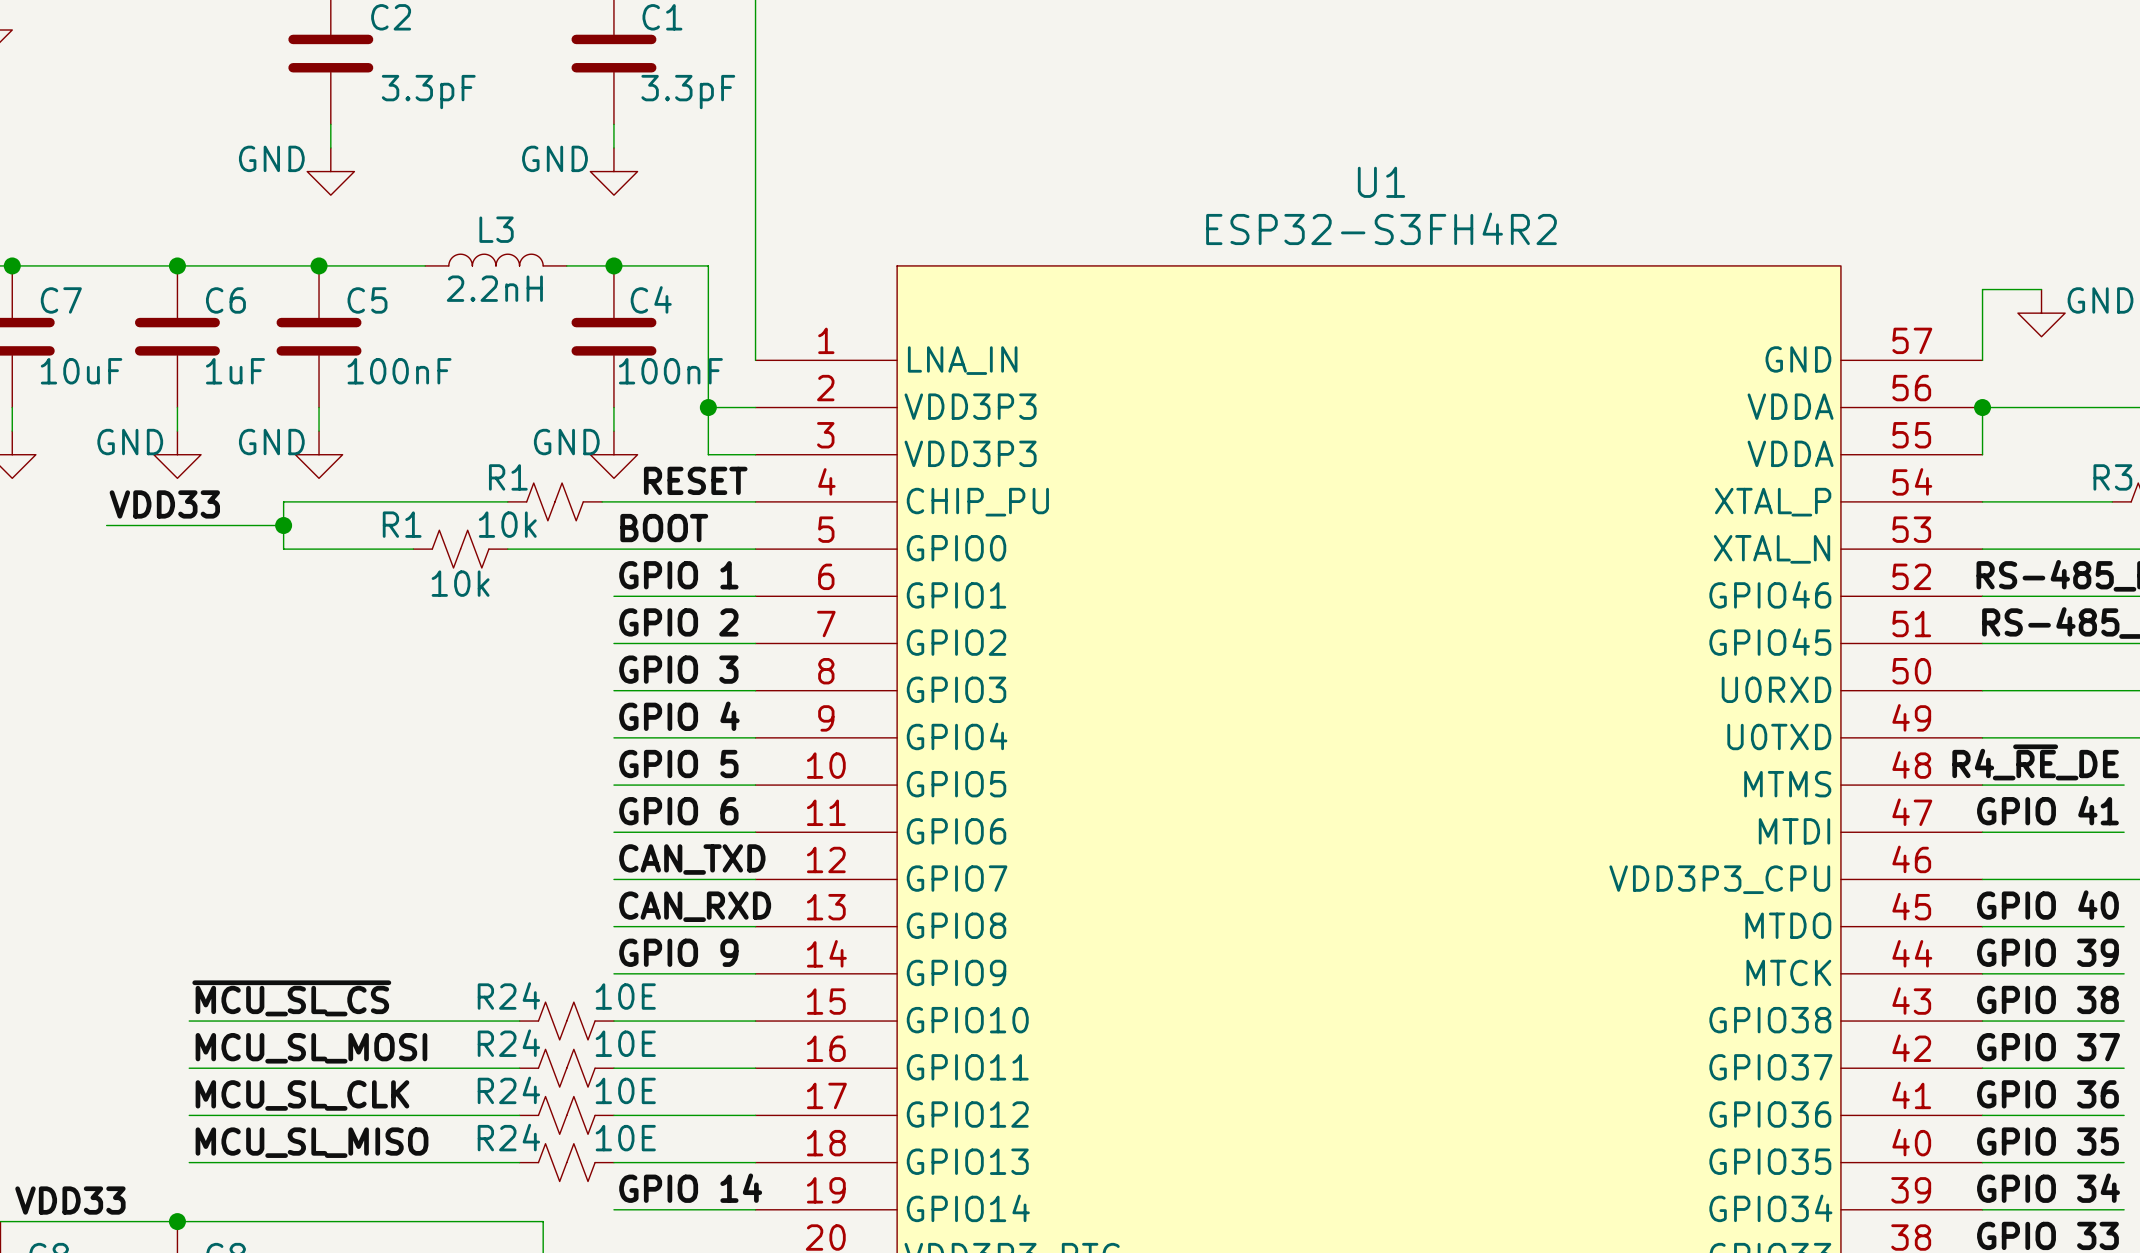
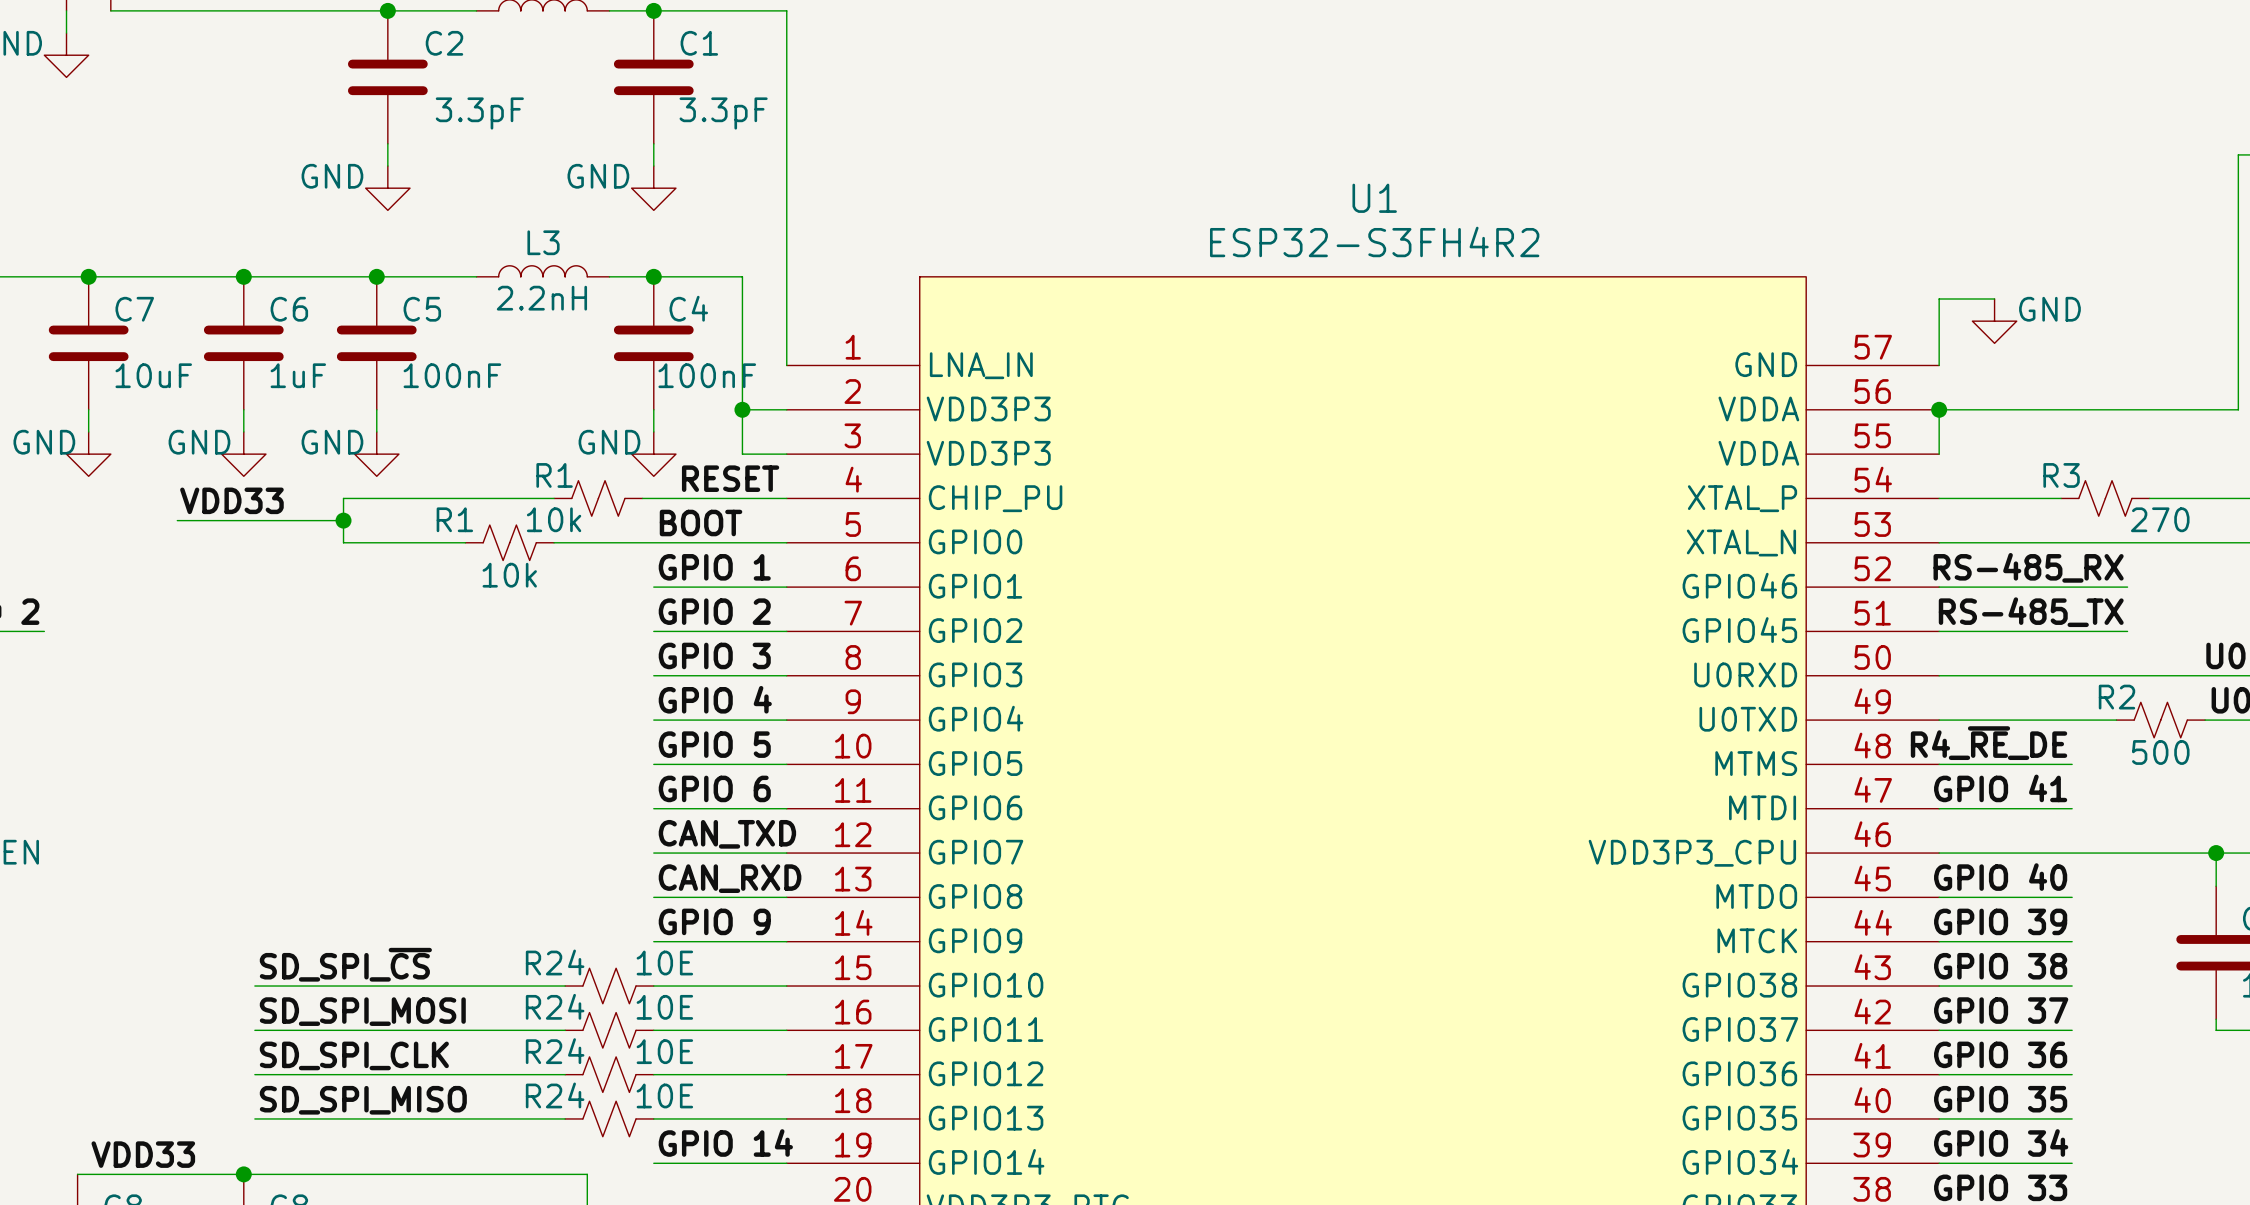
label: ~{MCU_SL_CS} (291, 998) -> SD_SPI_~{CS} (345, 964)
label: MCU_SL_MOSI (311, 1048) -> SD_SPI_MOSI (362, 1011)
label: MCU_SL_CLK (302, 1095) -> SD_SPI_CLK (354, 1055)
label: MCU_SL_MISO (312, 1142) -> SD_SPI_MISO (363, 1100)

